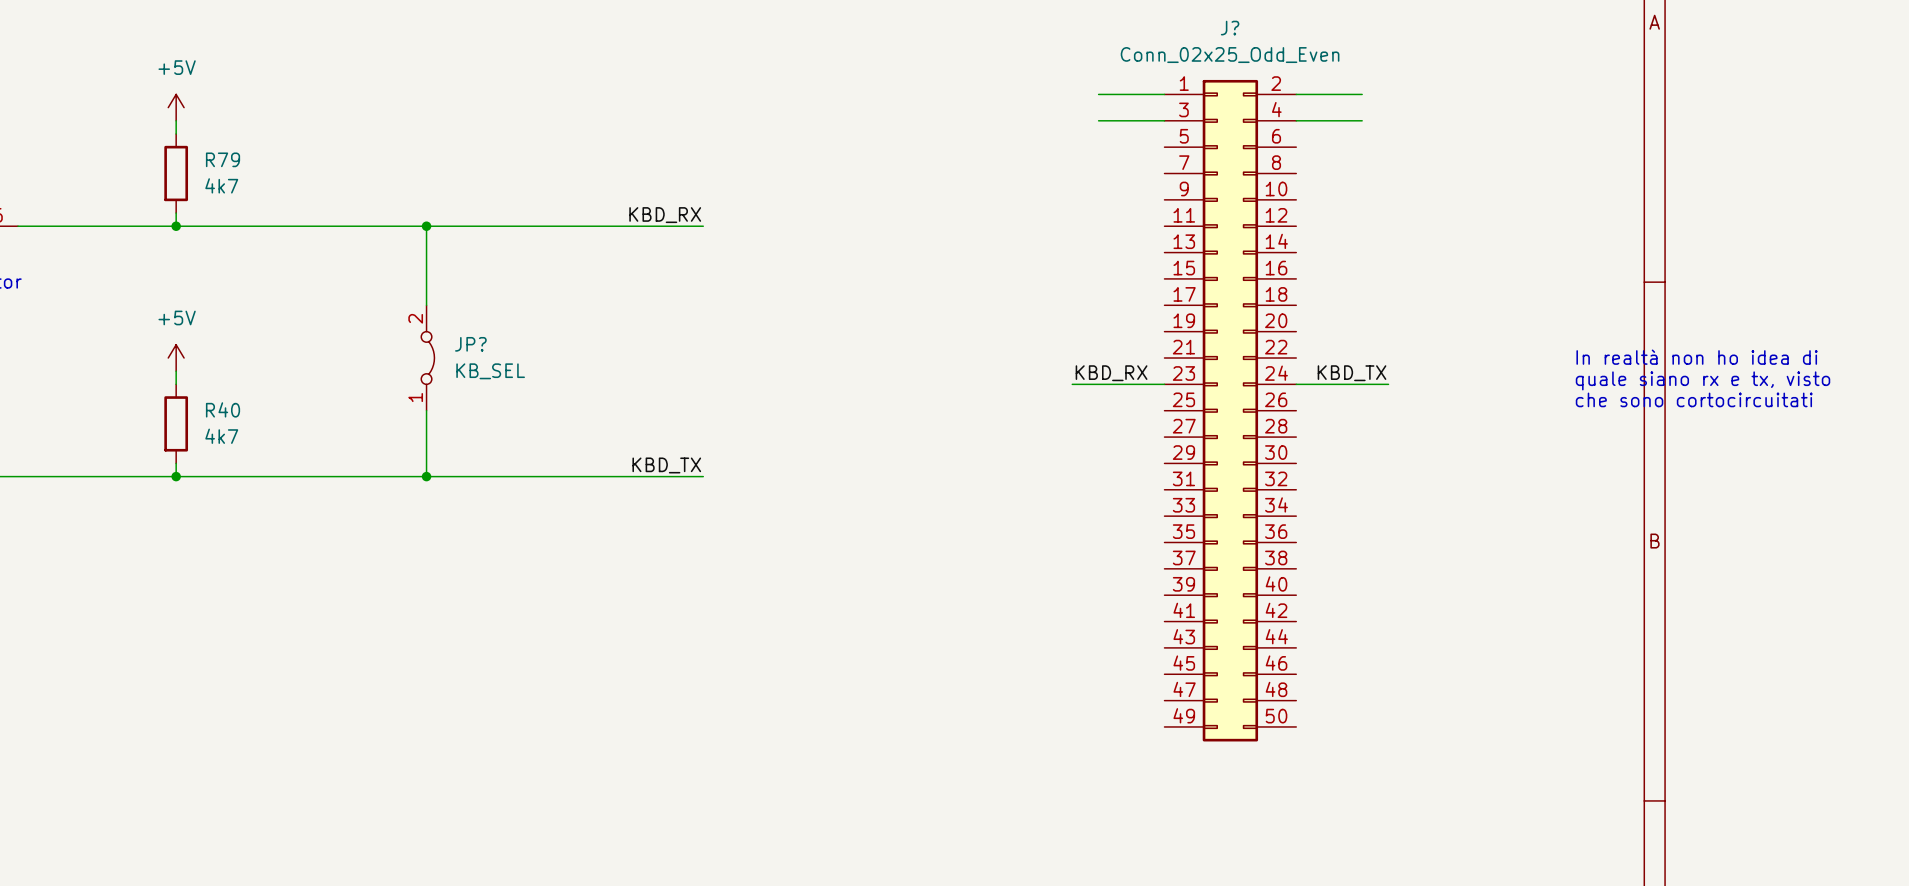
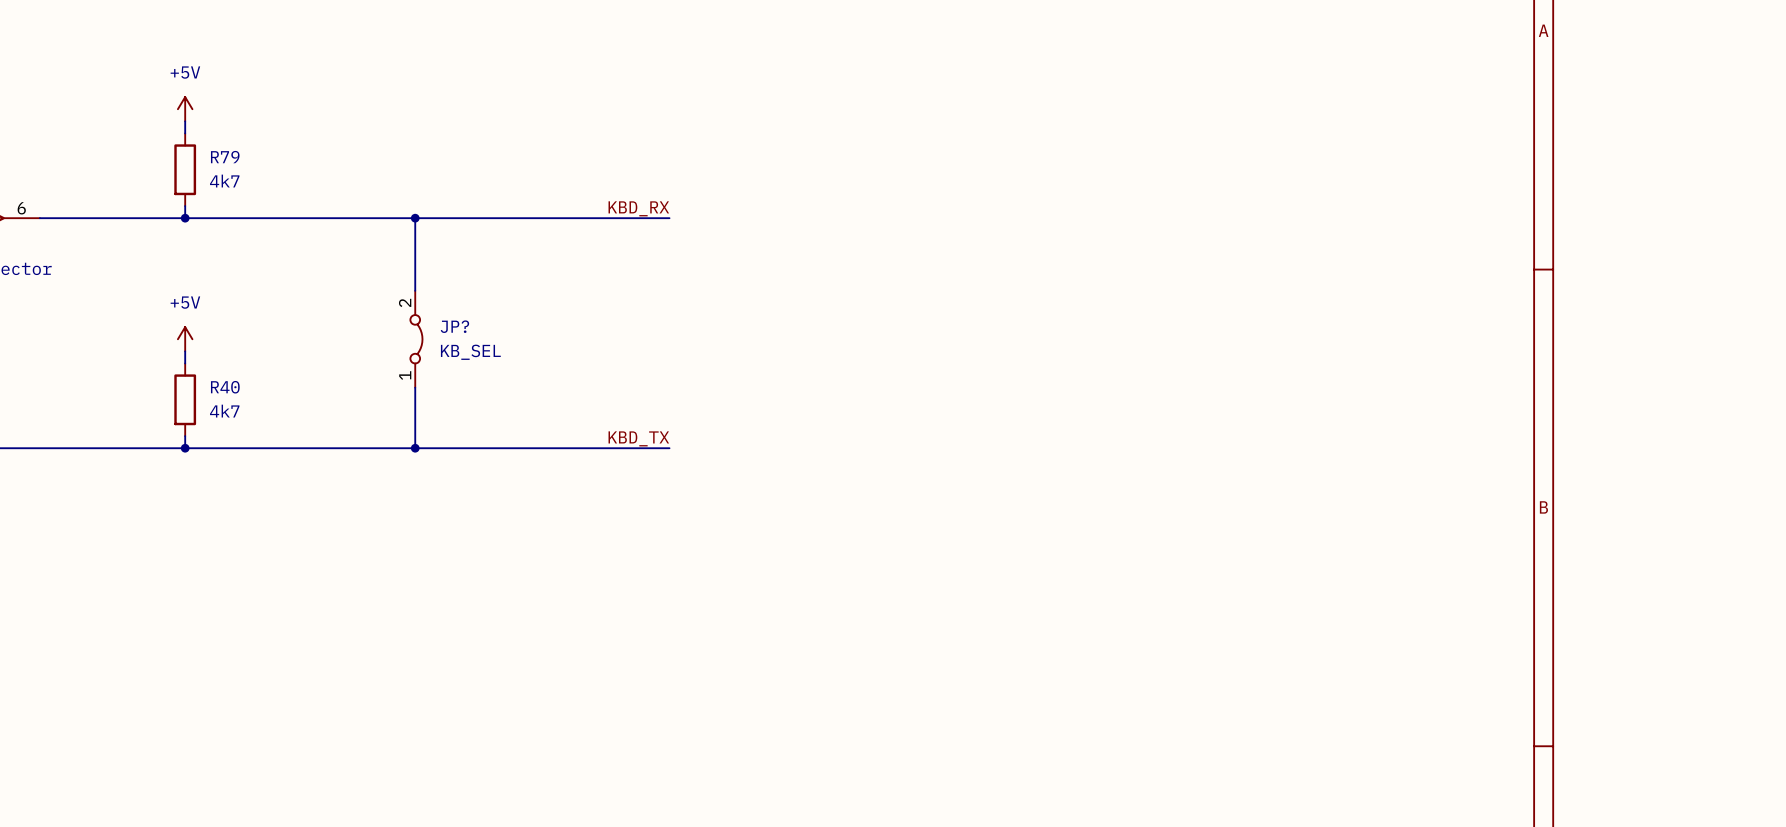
wire: (1098, 94) (1164, 94) -> none
wire: (1296, 94) (1362, 94) -> none
wire: (1098, 120) (1164, 120) -> none
wire: (1296, 120) (1362, 120) -> none
text: In realtà non ho idea di (1697, 357) -> none
label: KBD_RX (1111, 373) -> none
label: KBD_TX (1352, 373) -> none
text: quale siano rx e tx, visto (1703, 380) -> none
wire: (1072, 384) (1164, 384) -> none
wire: (1296, 384) (1388, 384) -> none
text: che sono cortocircuitati (1694, 399) -> none
J?: Conn_02x25_Odd_Even (1230, 410) -> none

